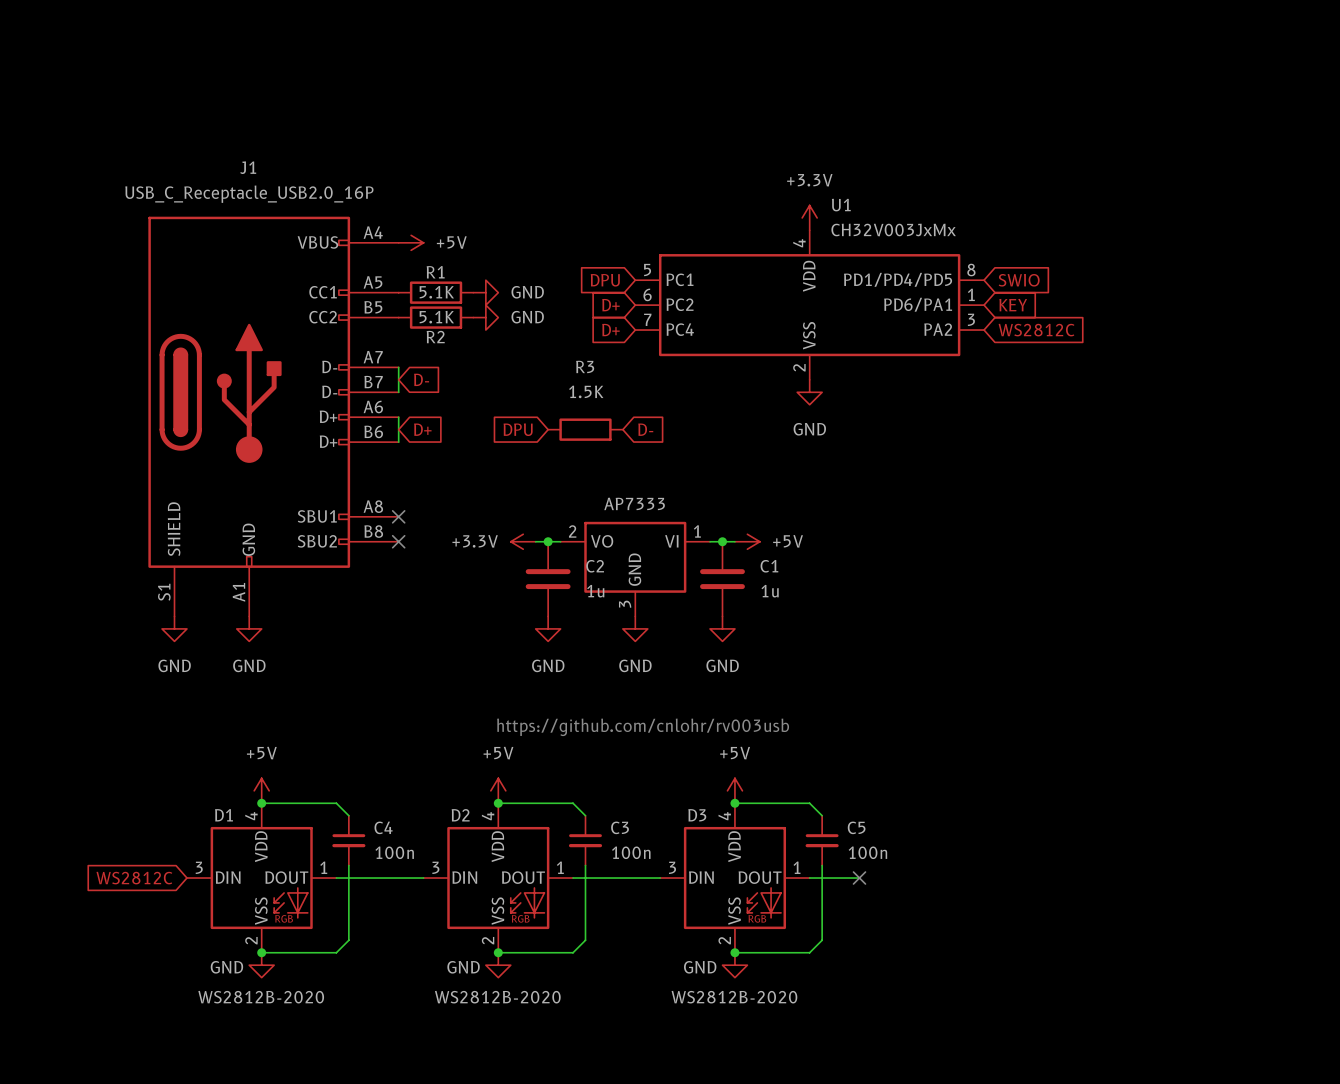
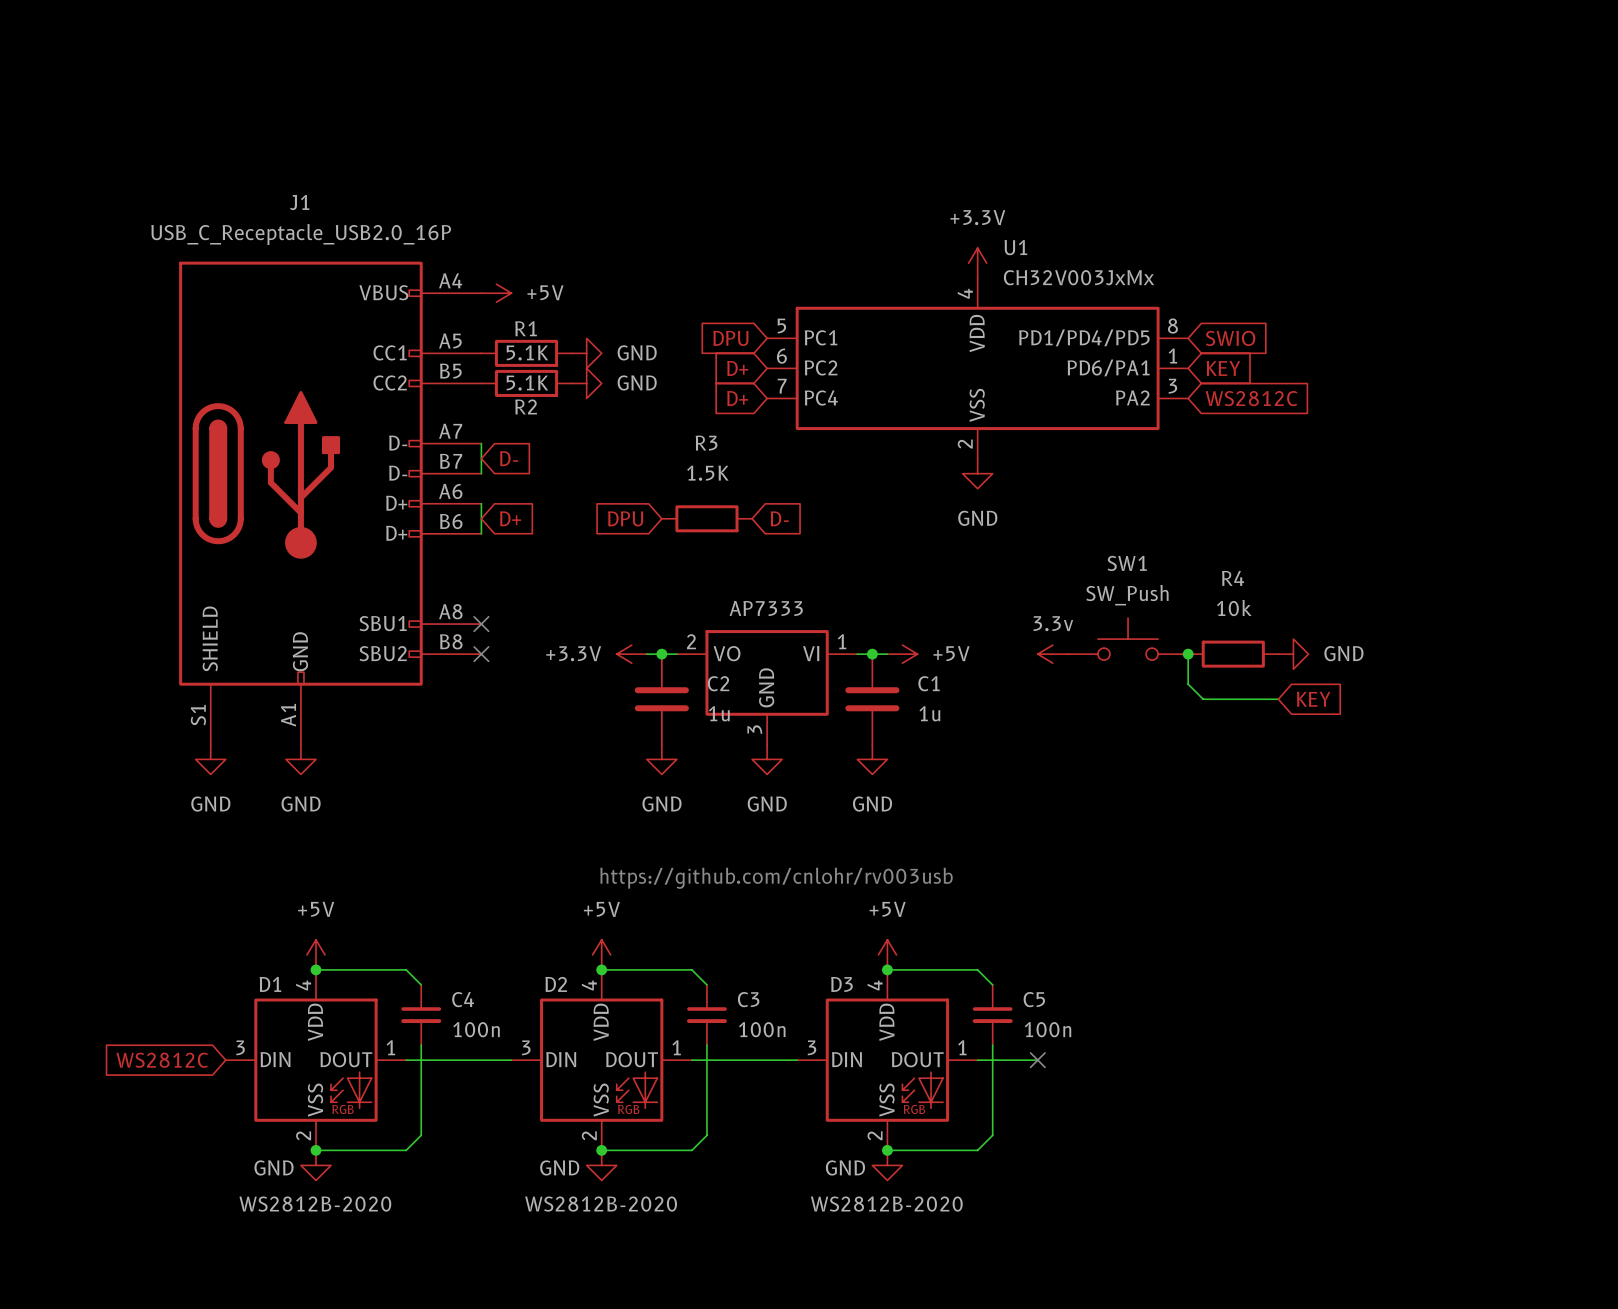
SW1: none -> SW_Push (1128, 639)
power symbol: none -> 3.3v (1052, 654)
wire: none -> (1188, 654) (1188, 684) (1203, 699) (1278, 699)
junction: none -> (1188, 654)
R4: none -> 10k (1233, 654)
power symbol: none -> GND (1293, 654)
global label: none -> KEY (1313, 699)

